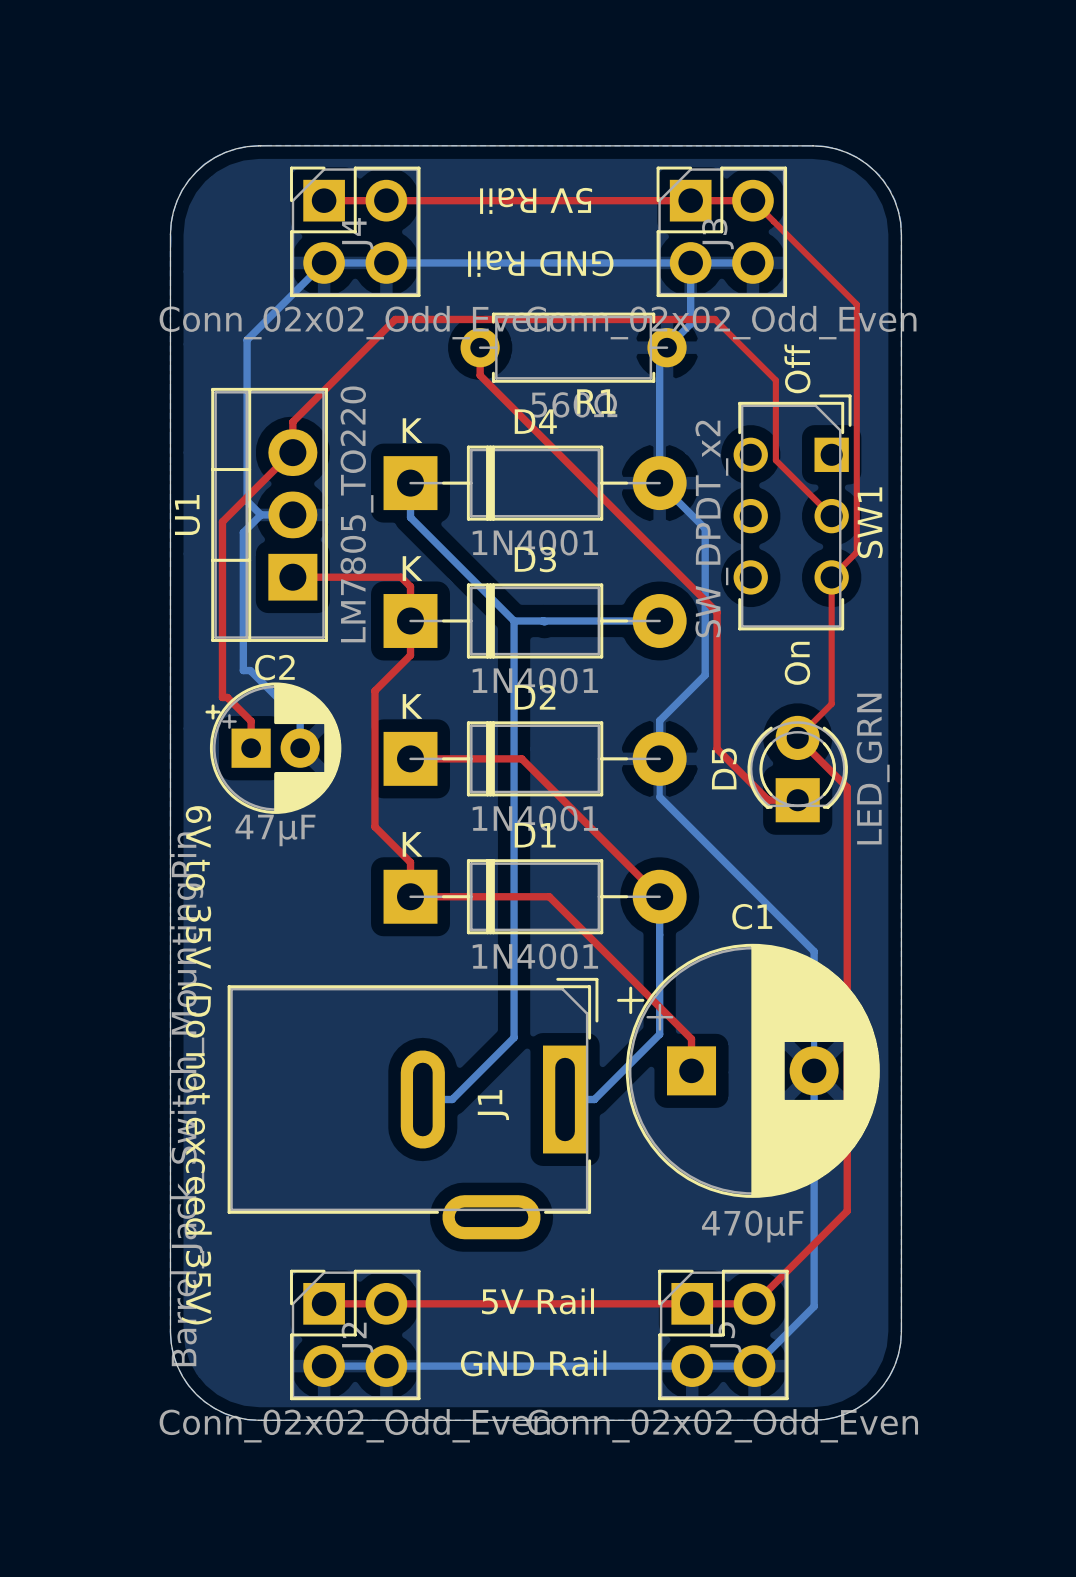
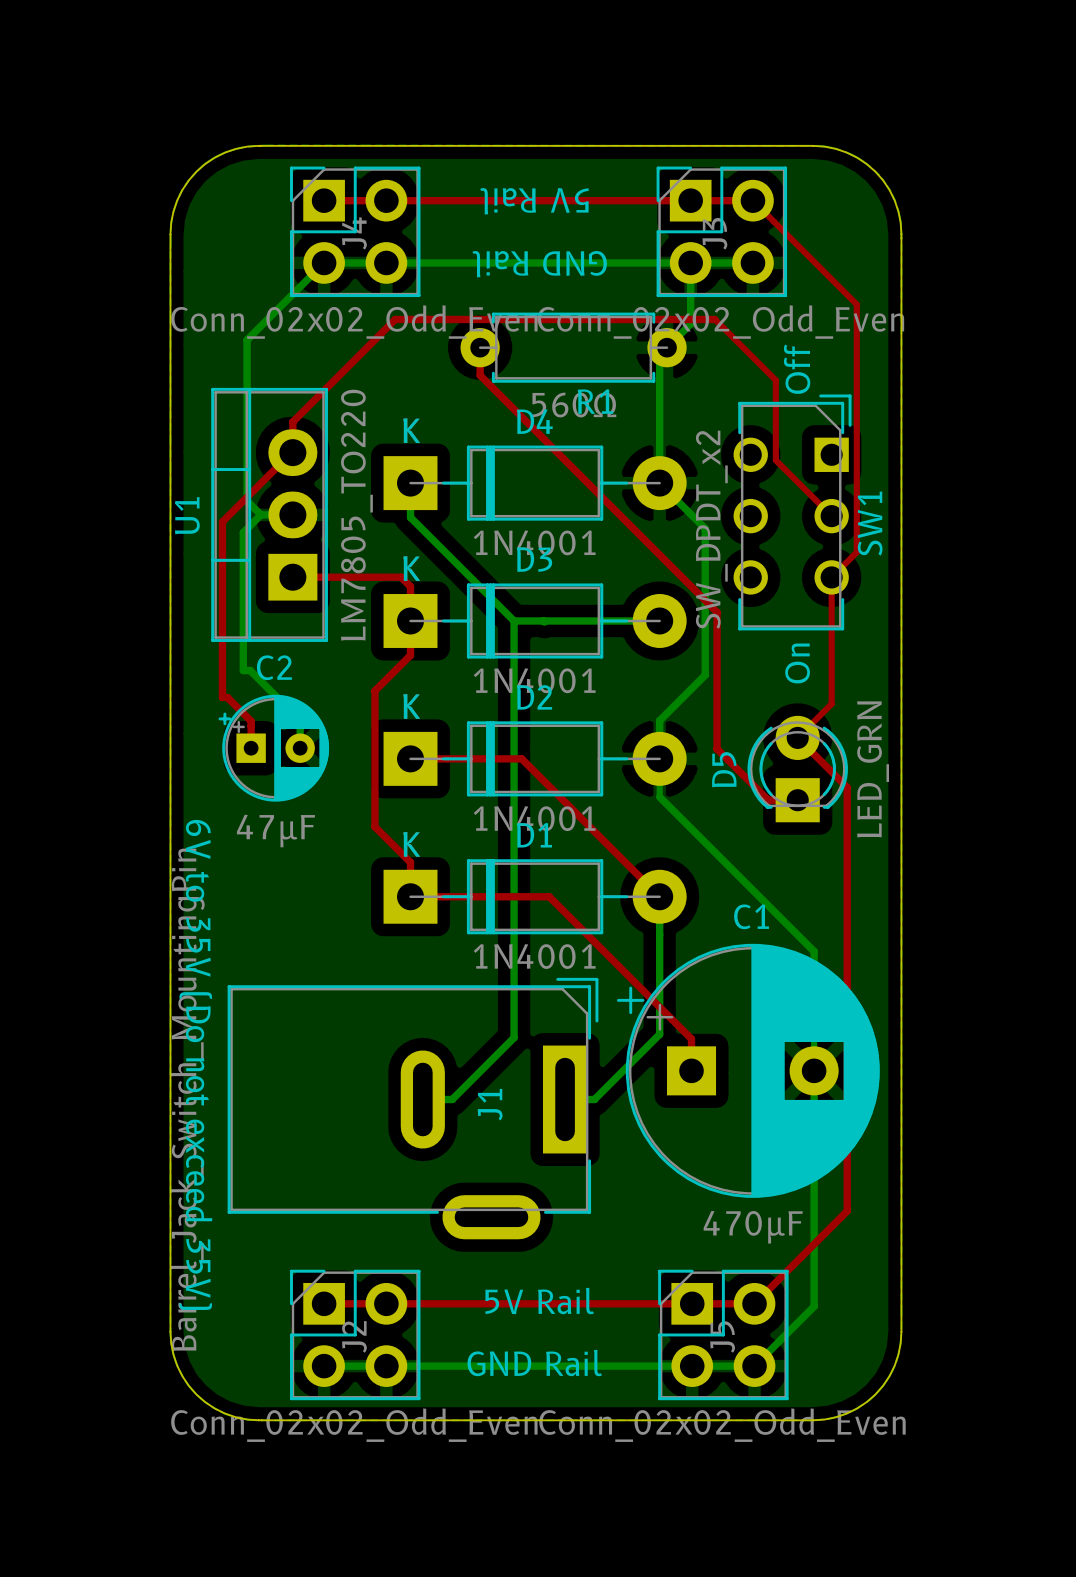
C2 footprint: [205, 682, 342, 814] -> [218, 694, 330, 802]

